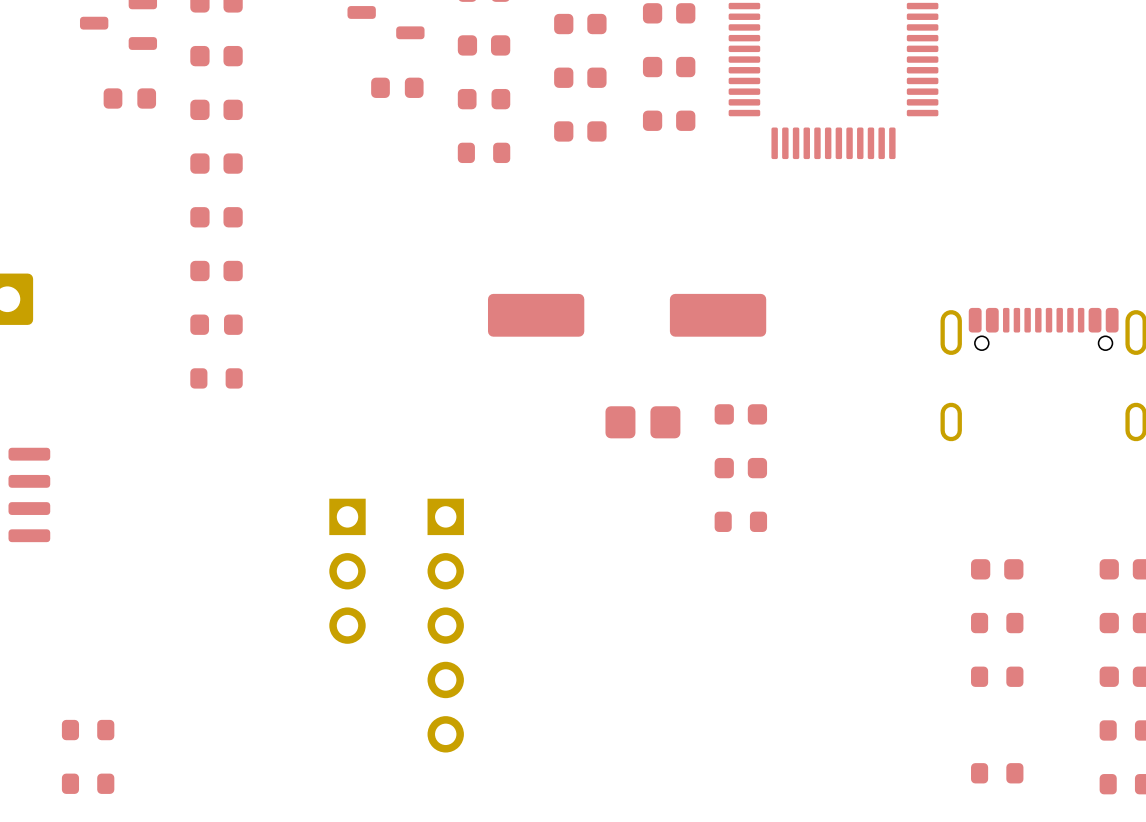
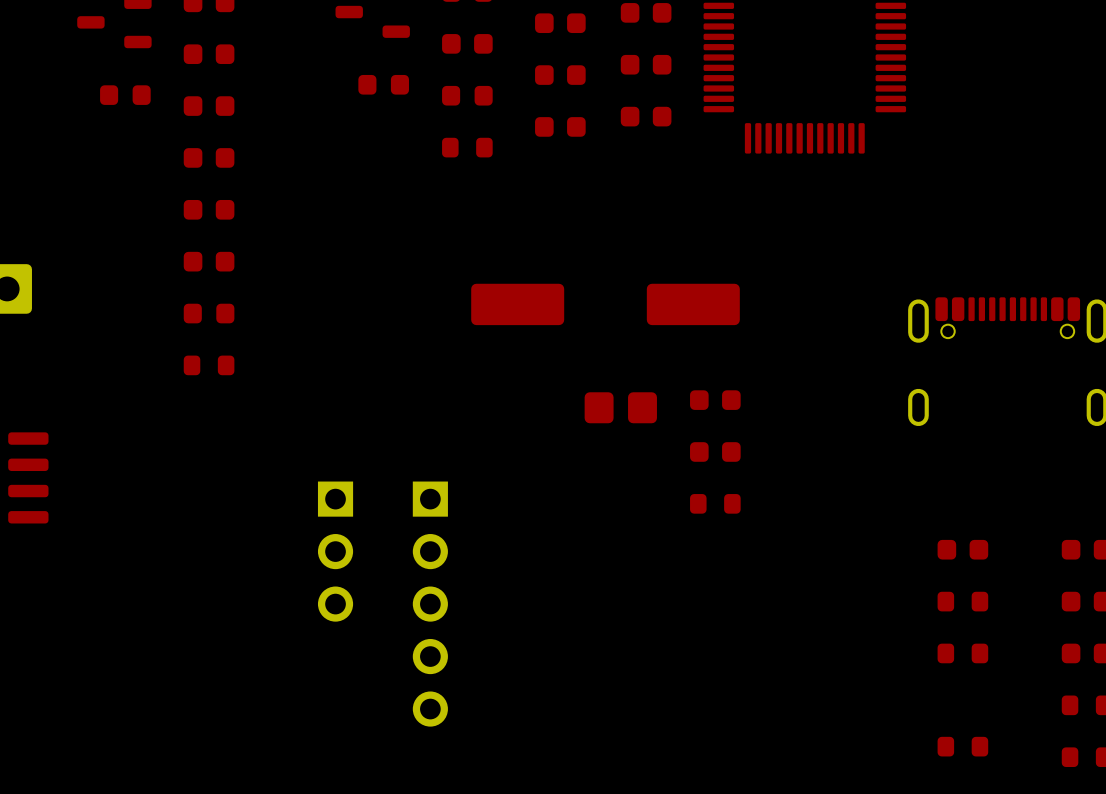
part: (88, 730) -> none
part: (88, 783) -> none

